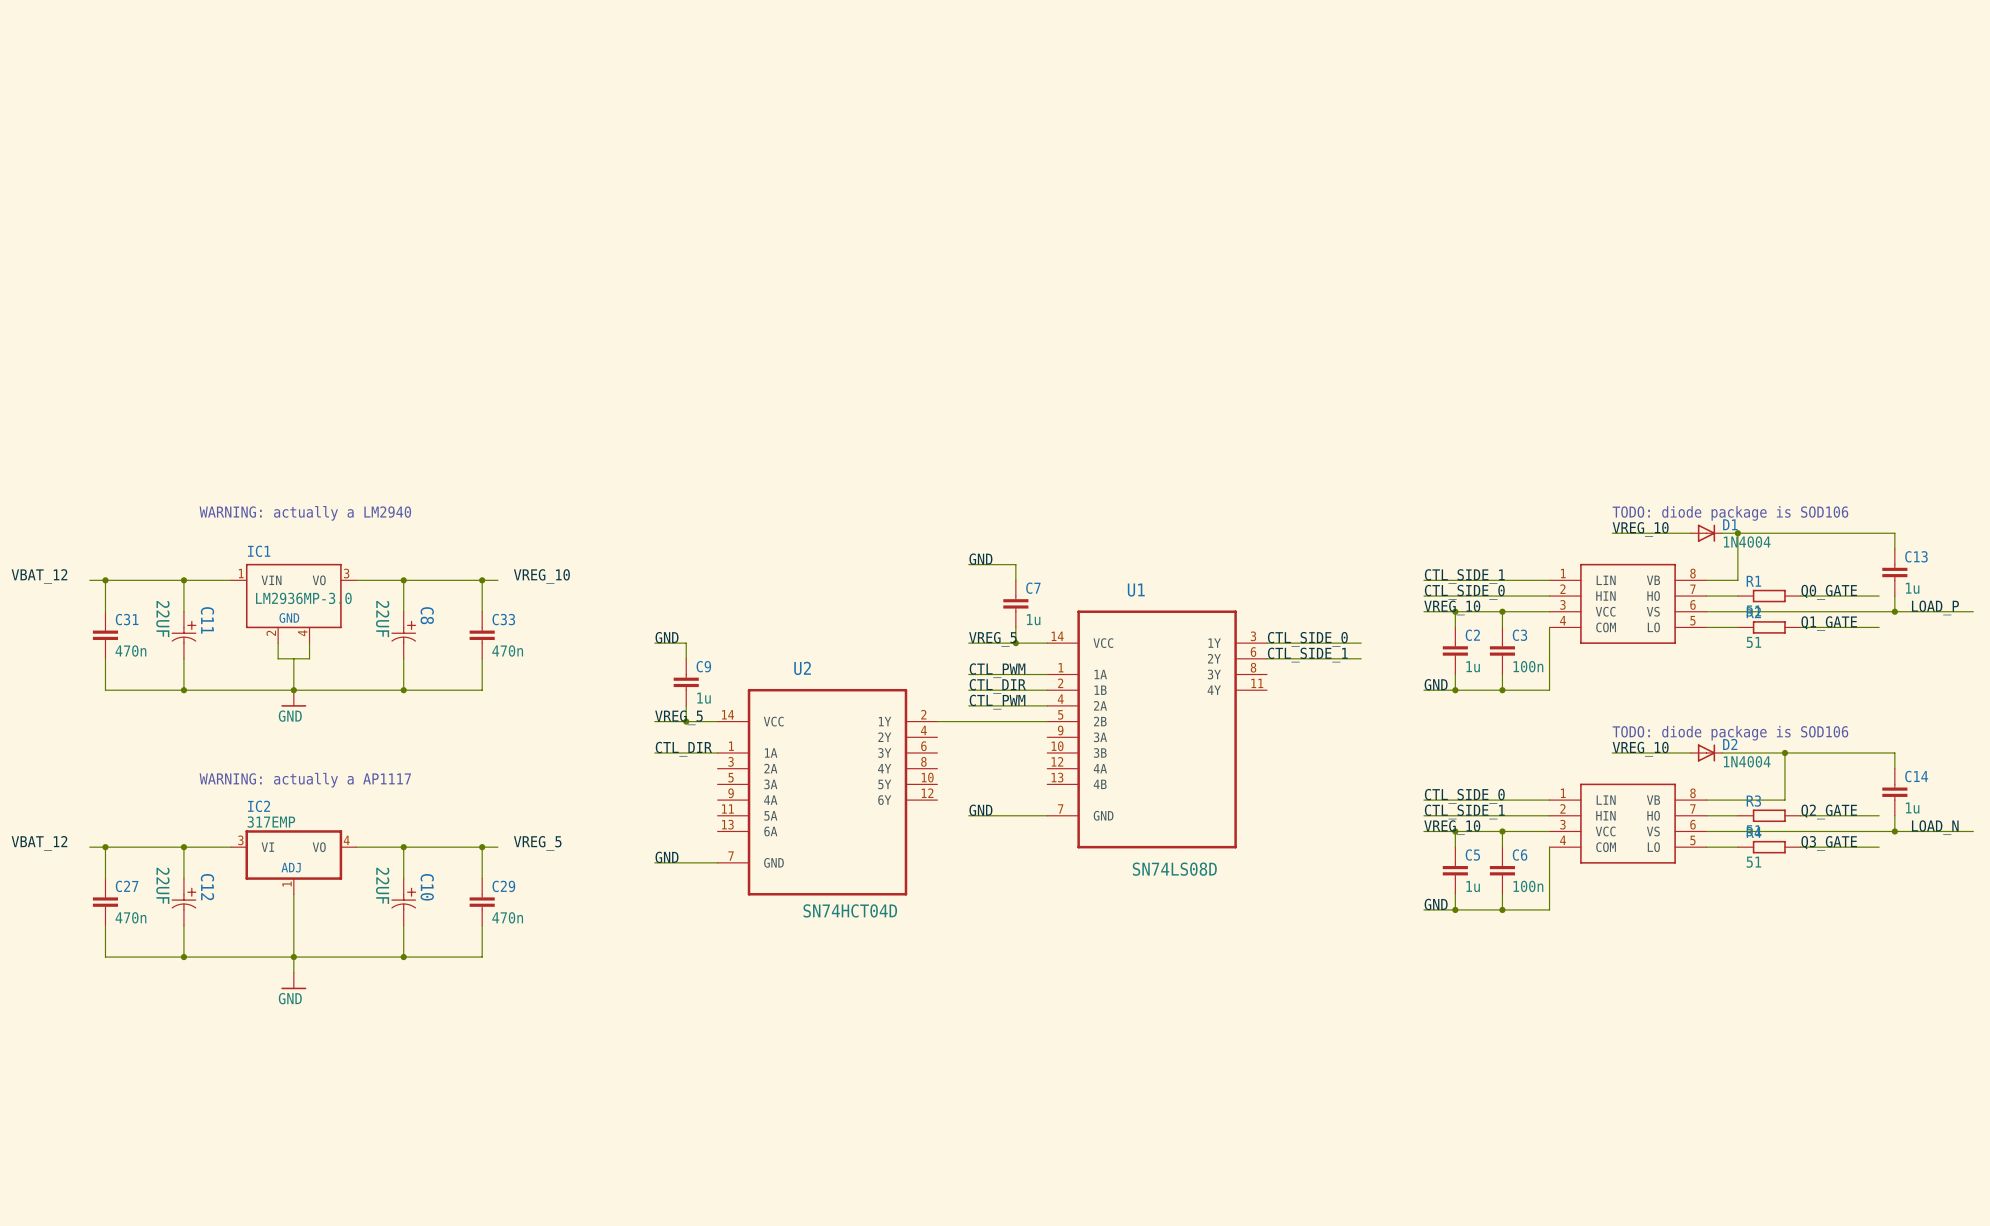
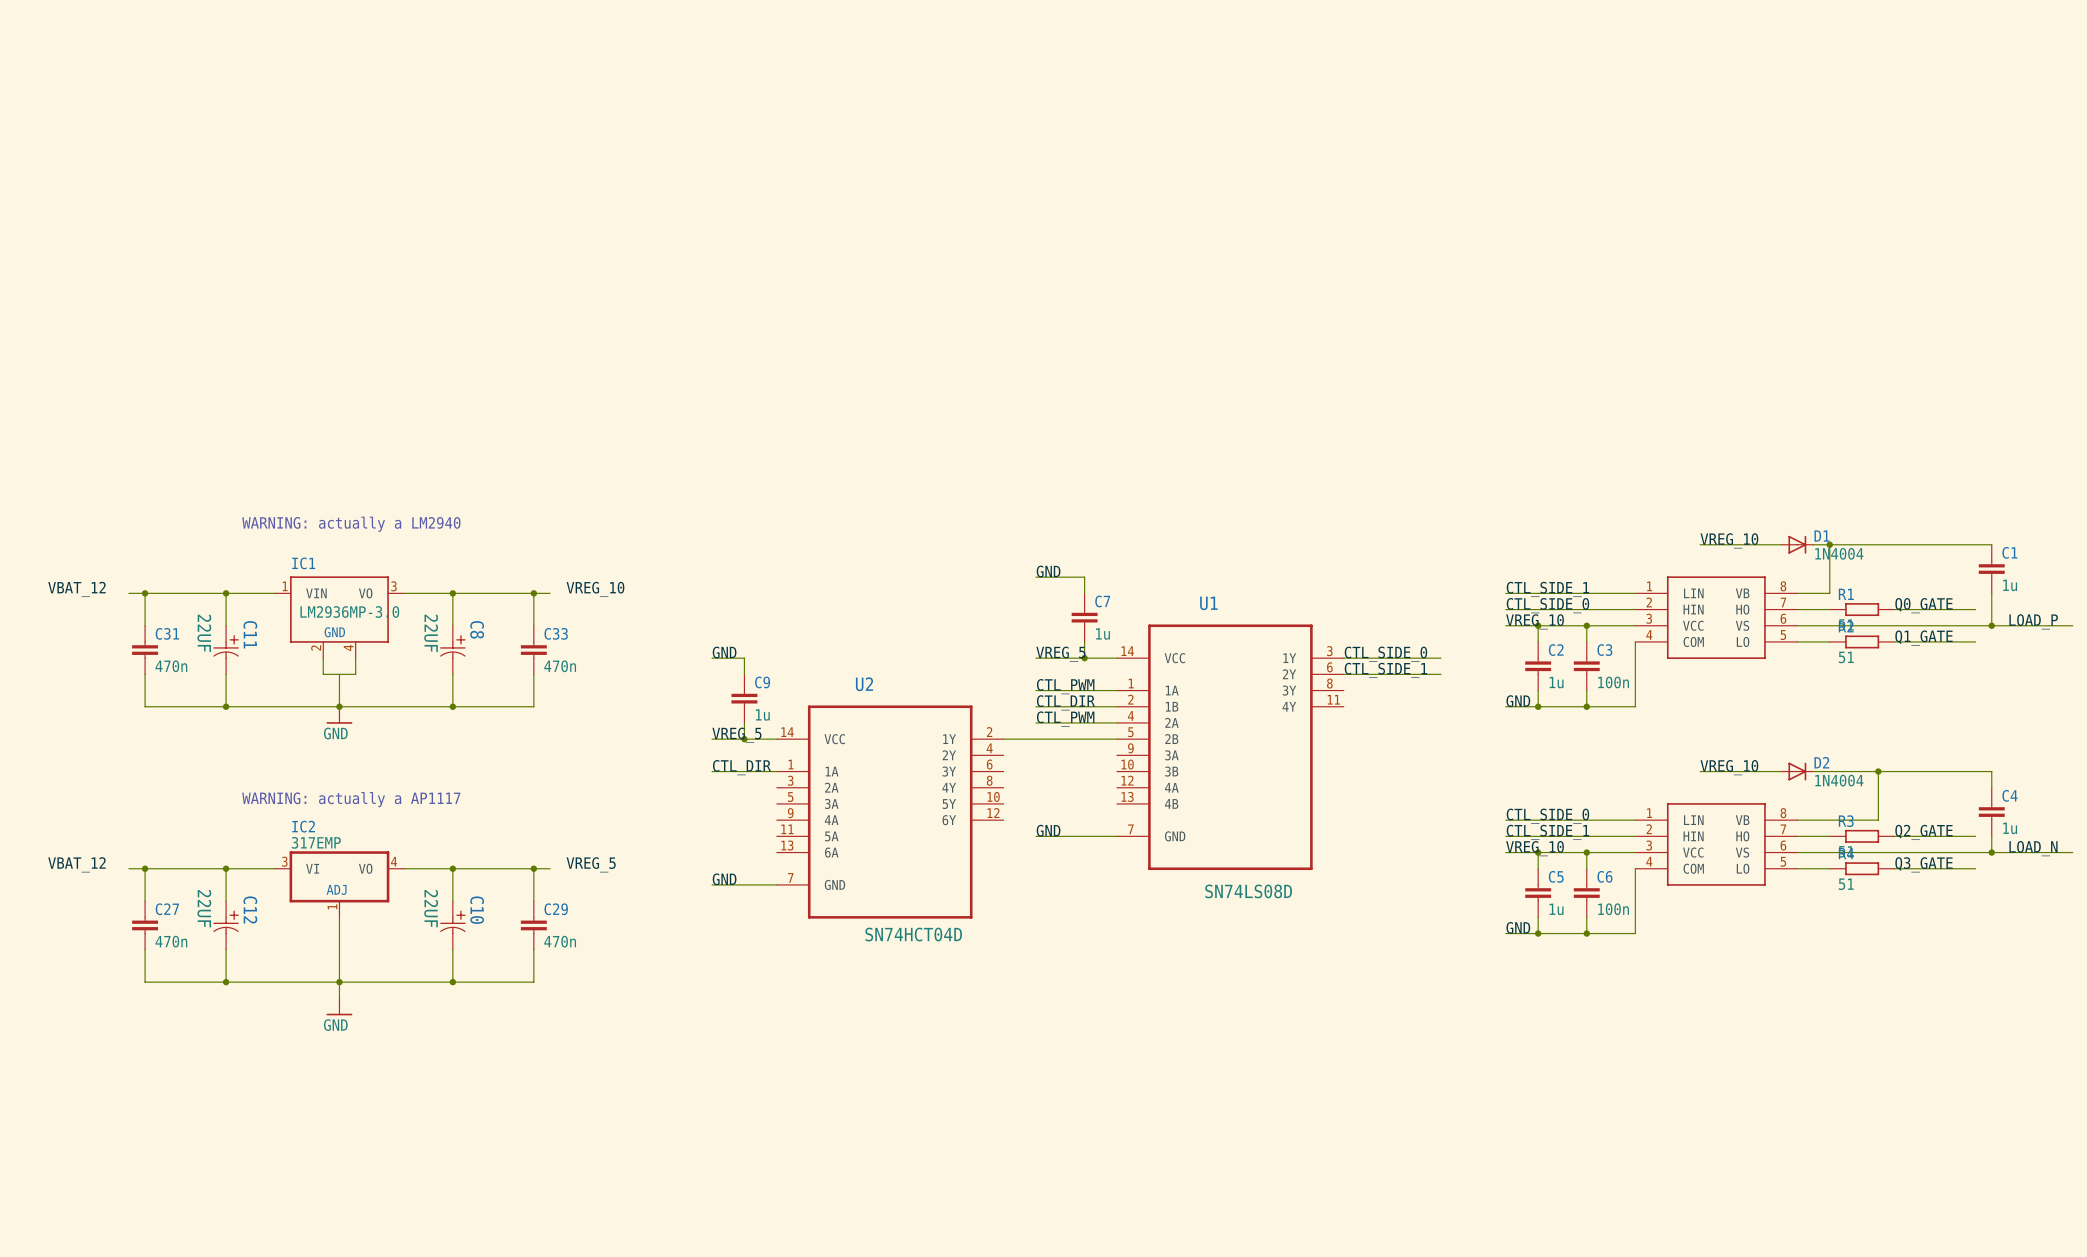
text: TODO: diode package is SOD106 (1730, 513) -> none
C1: none -> 1u (1991, 569)
C13: 1u (1894, 572) -> none
text: TODO: diode package is SOD106 (1730, 733) -> none
C14 name: C14 (1916, 776) -> C4 (2010, 795)

